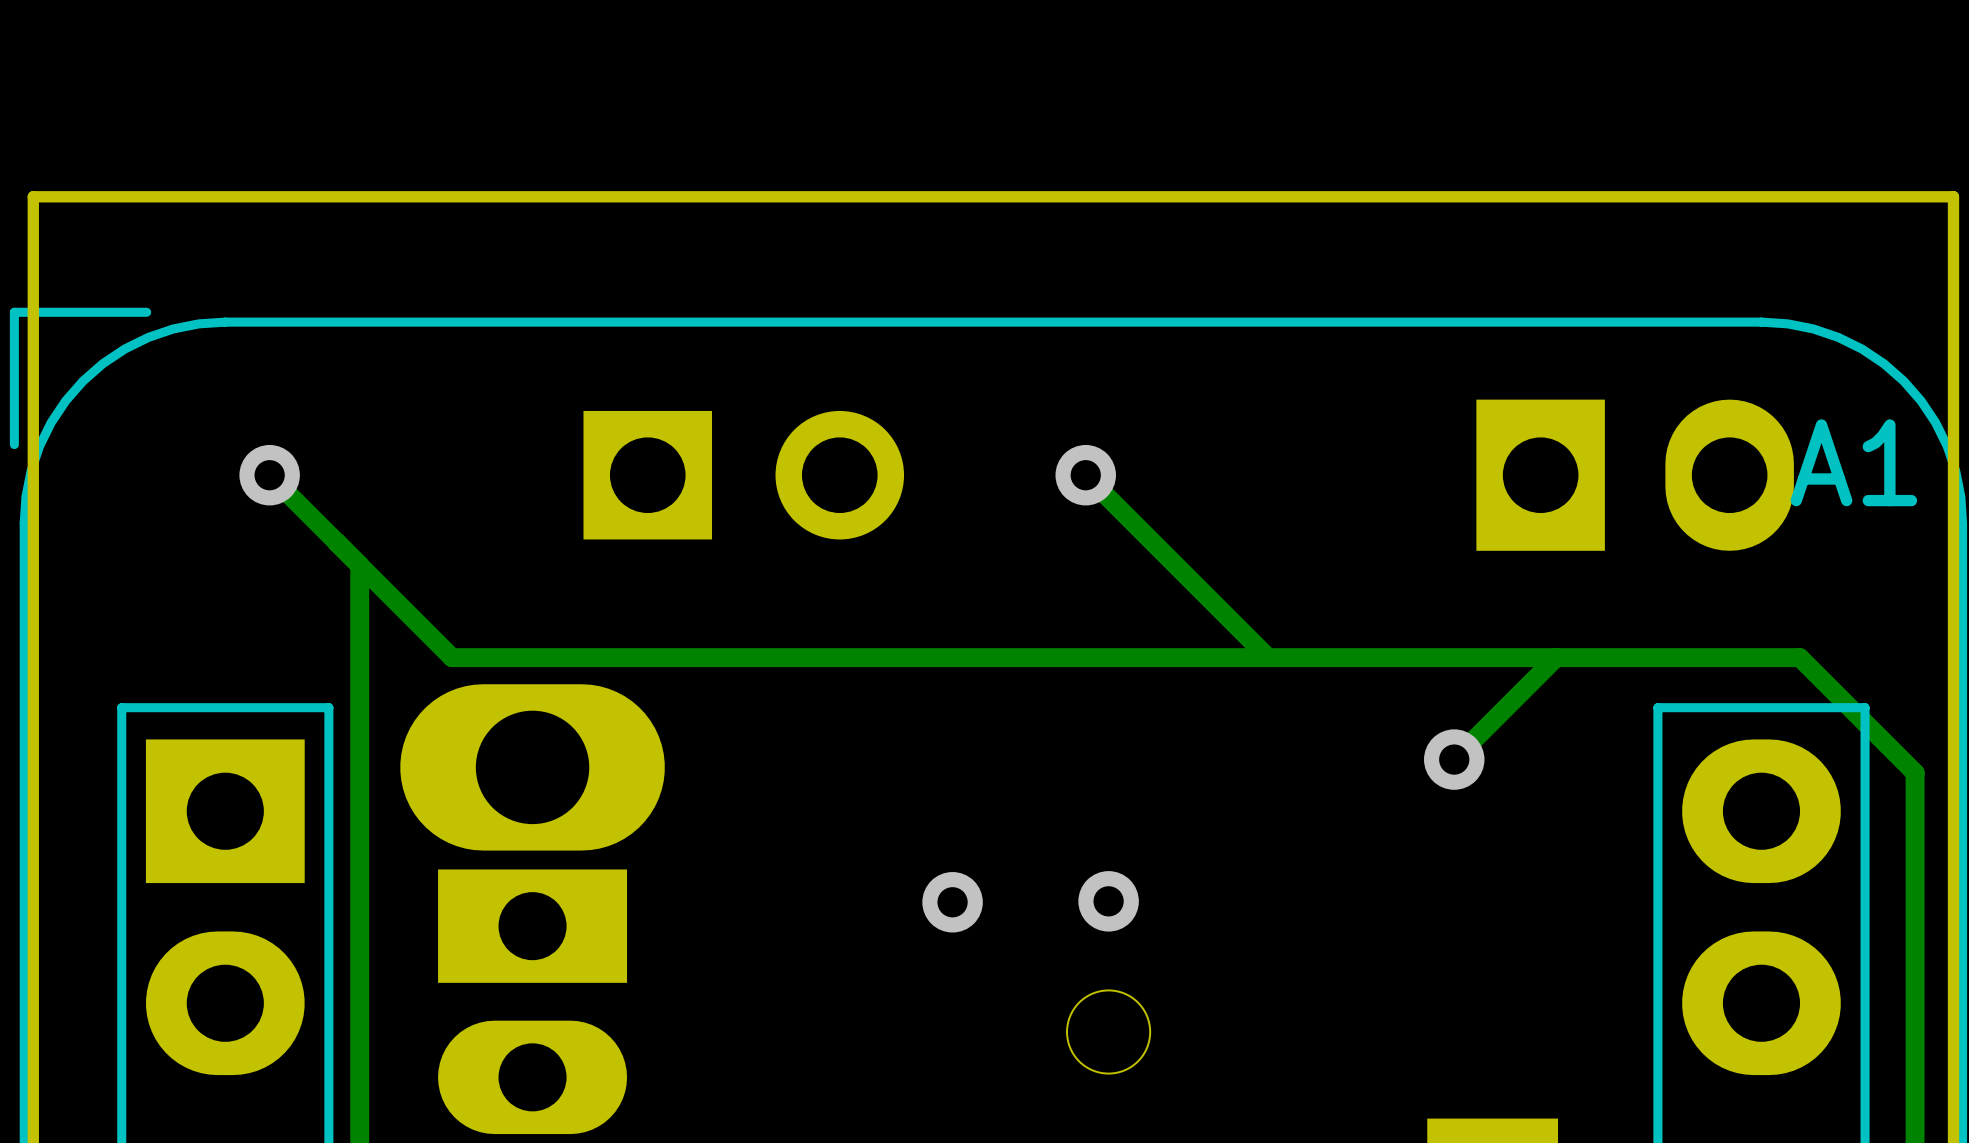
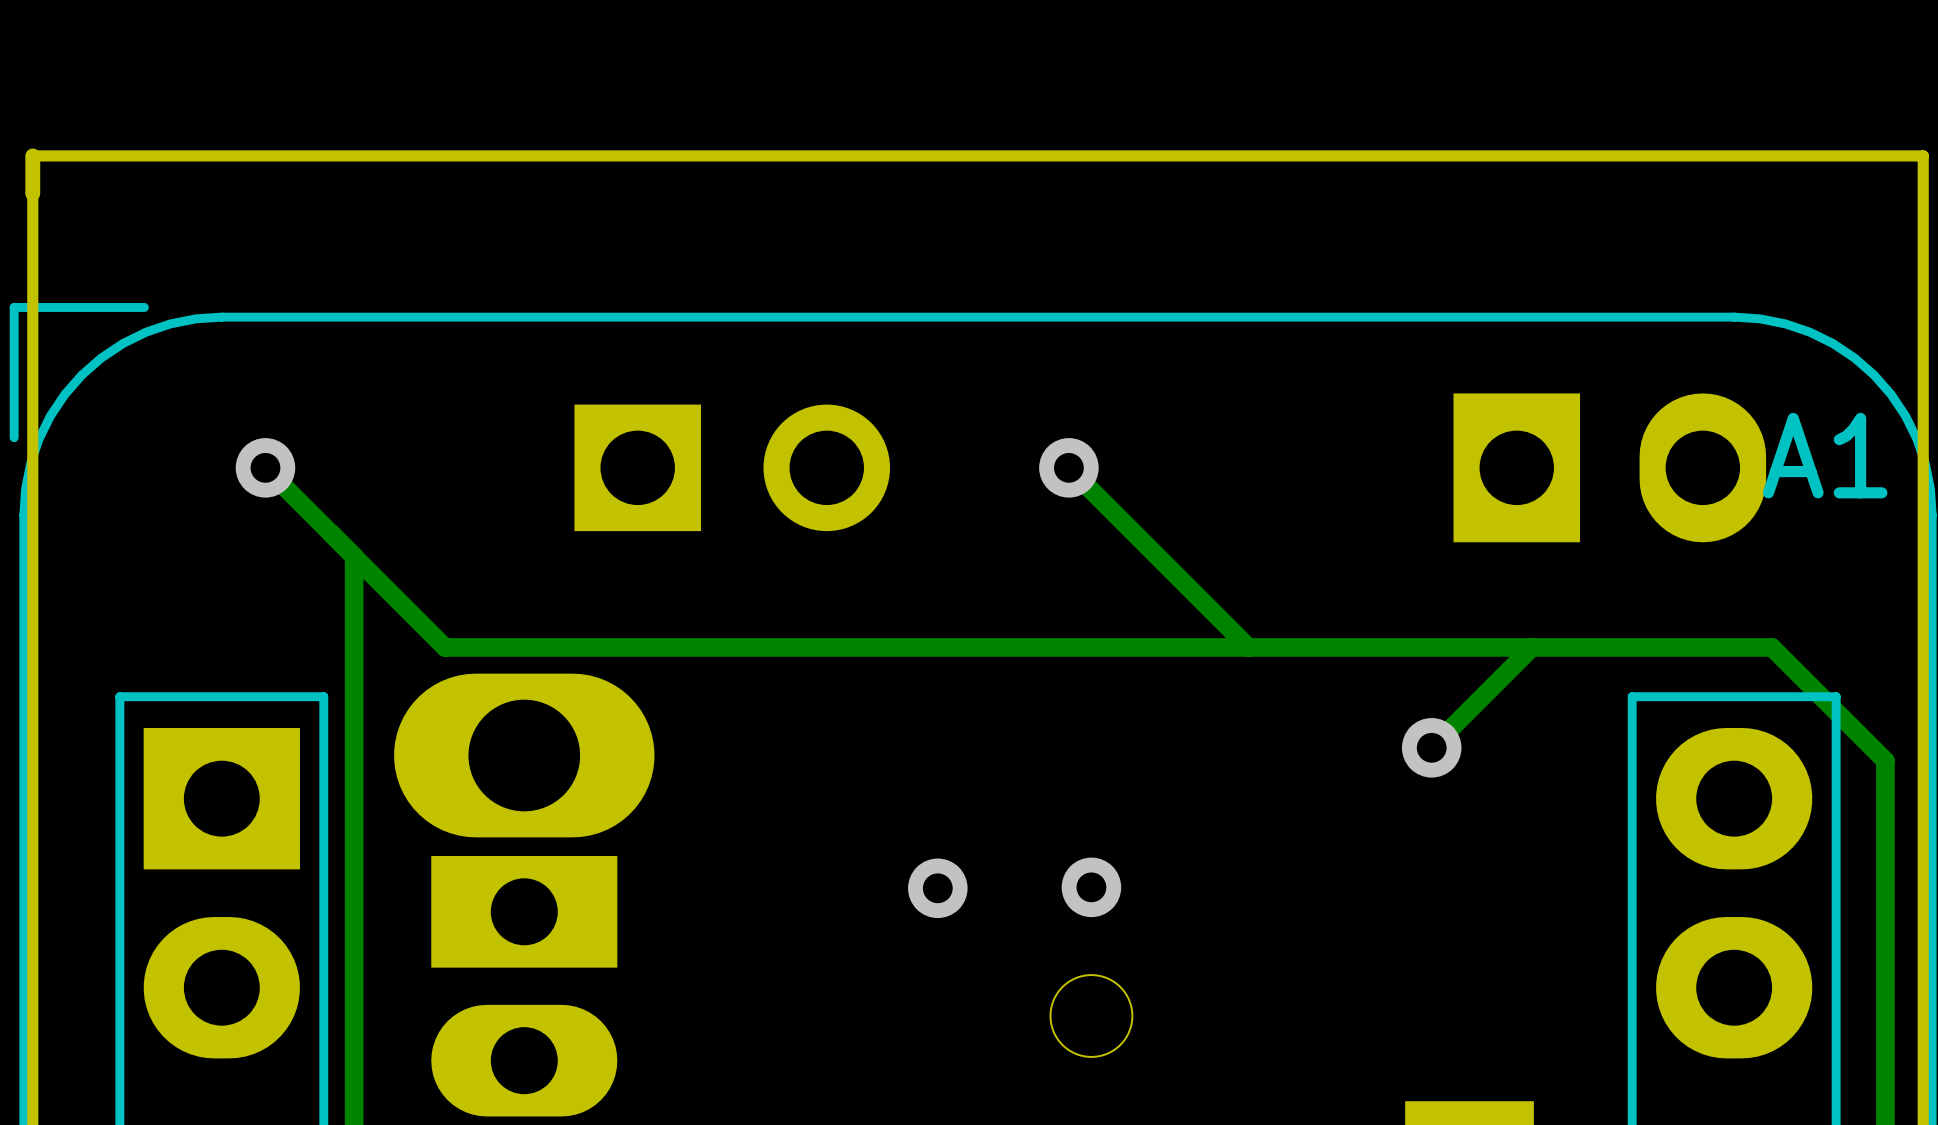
board edge: (1953, 196) (33, 196) -> (1923, 193) (1923, 155) (32, 155) (32, 193)

